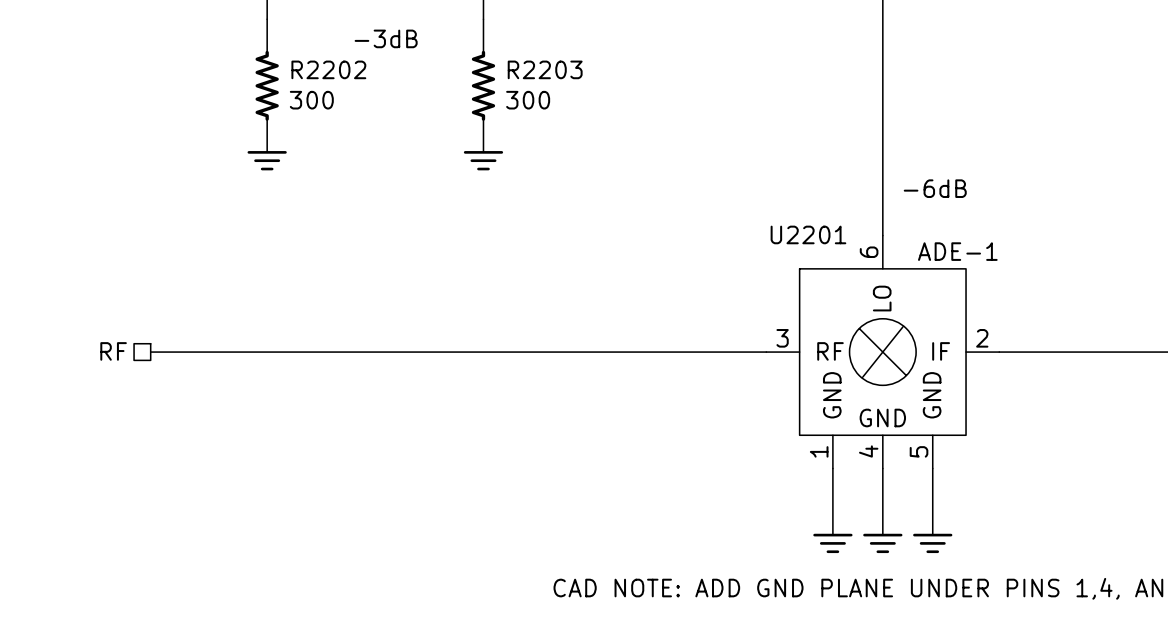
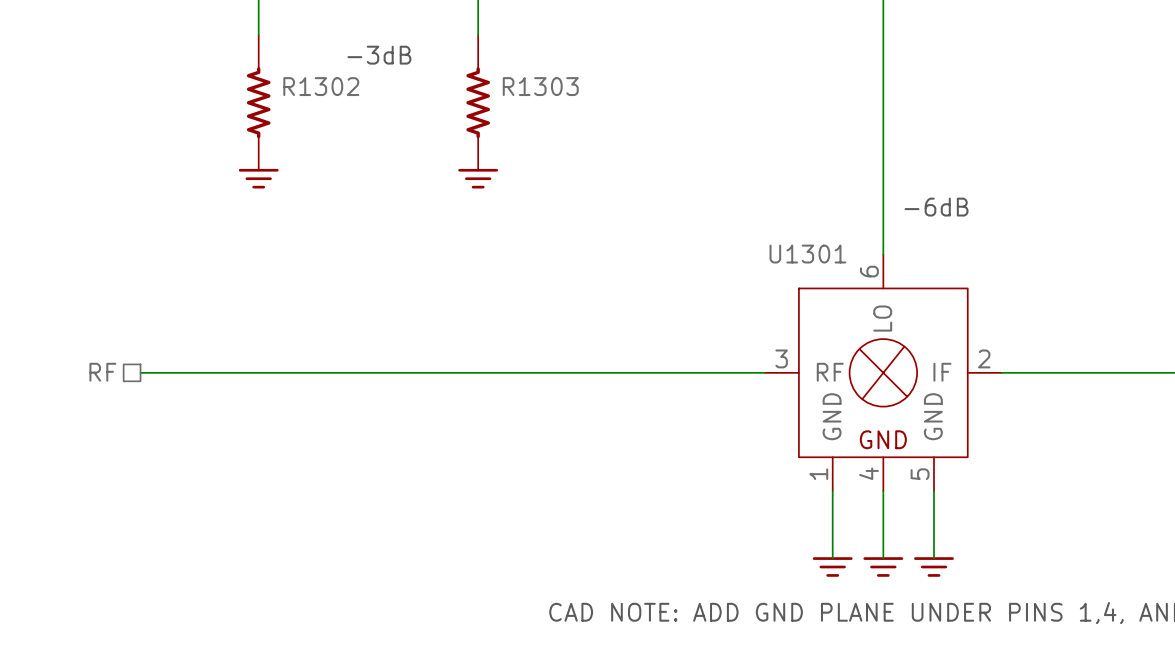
R2202 name: R2202 (328, 69) -> R1302 (321, 86)
R2203 name: R2203 (545, 69) -> R1303 (540, 86)
R2202 value: 300 (311, 100) -> none
R2203 value: 300 (528, 100) -> none
U2201 name: U2201 (808, 234) -> U1301 (807, 254)
U2201 value: ADE-1 (957, 251) -> none

